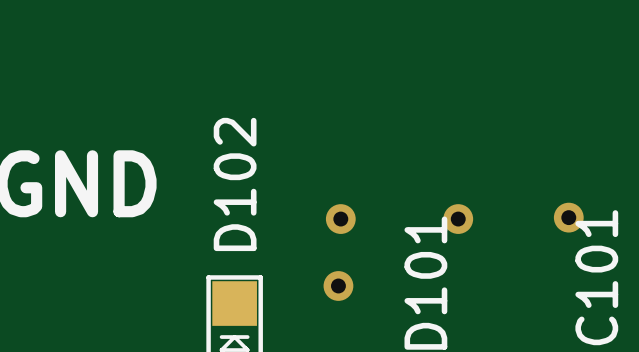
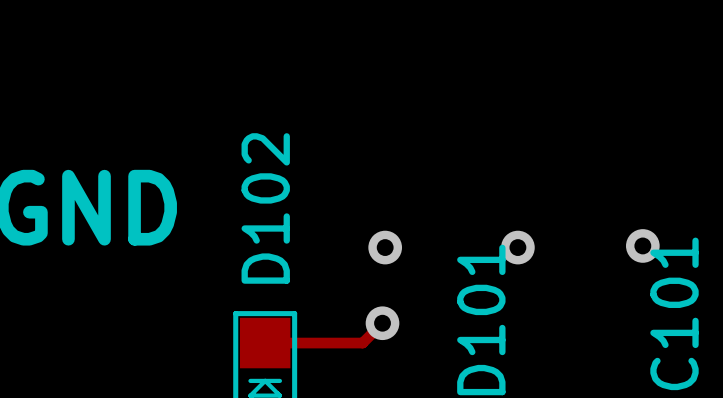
track: none -> (382, 323) (362, 343) (265, 343)

